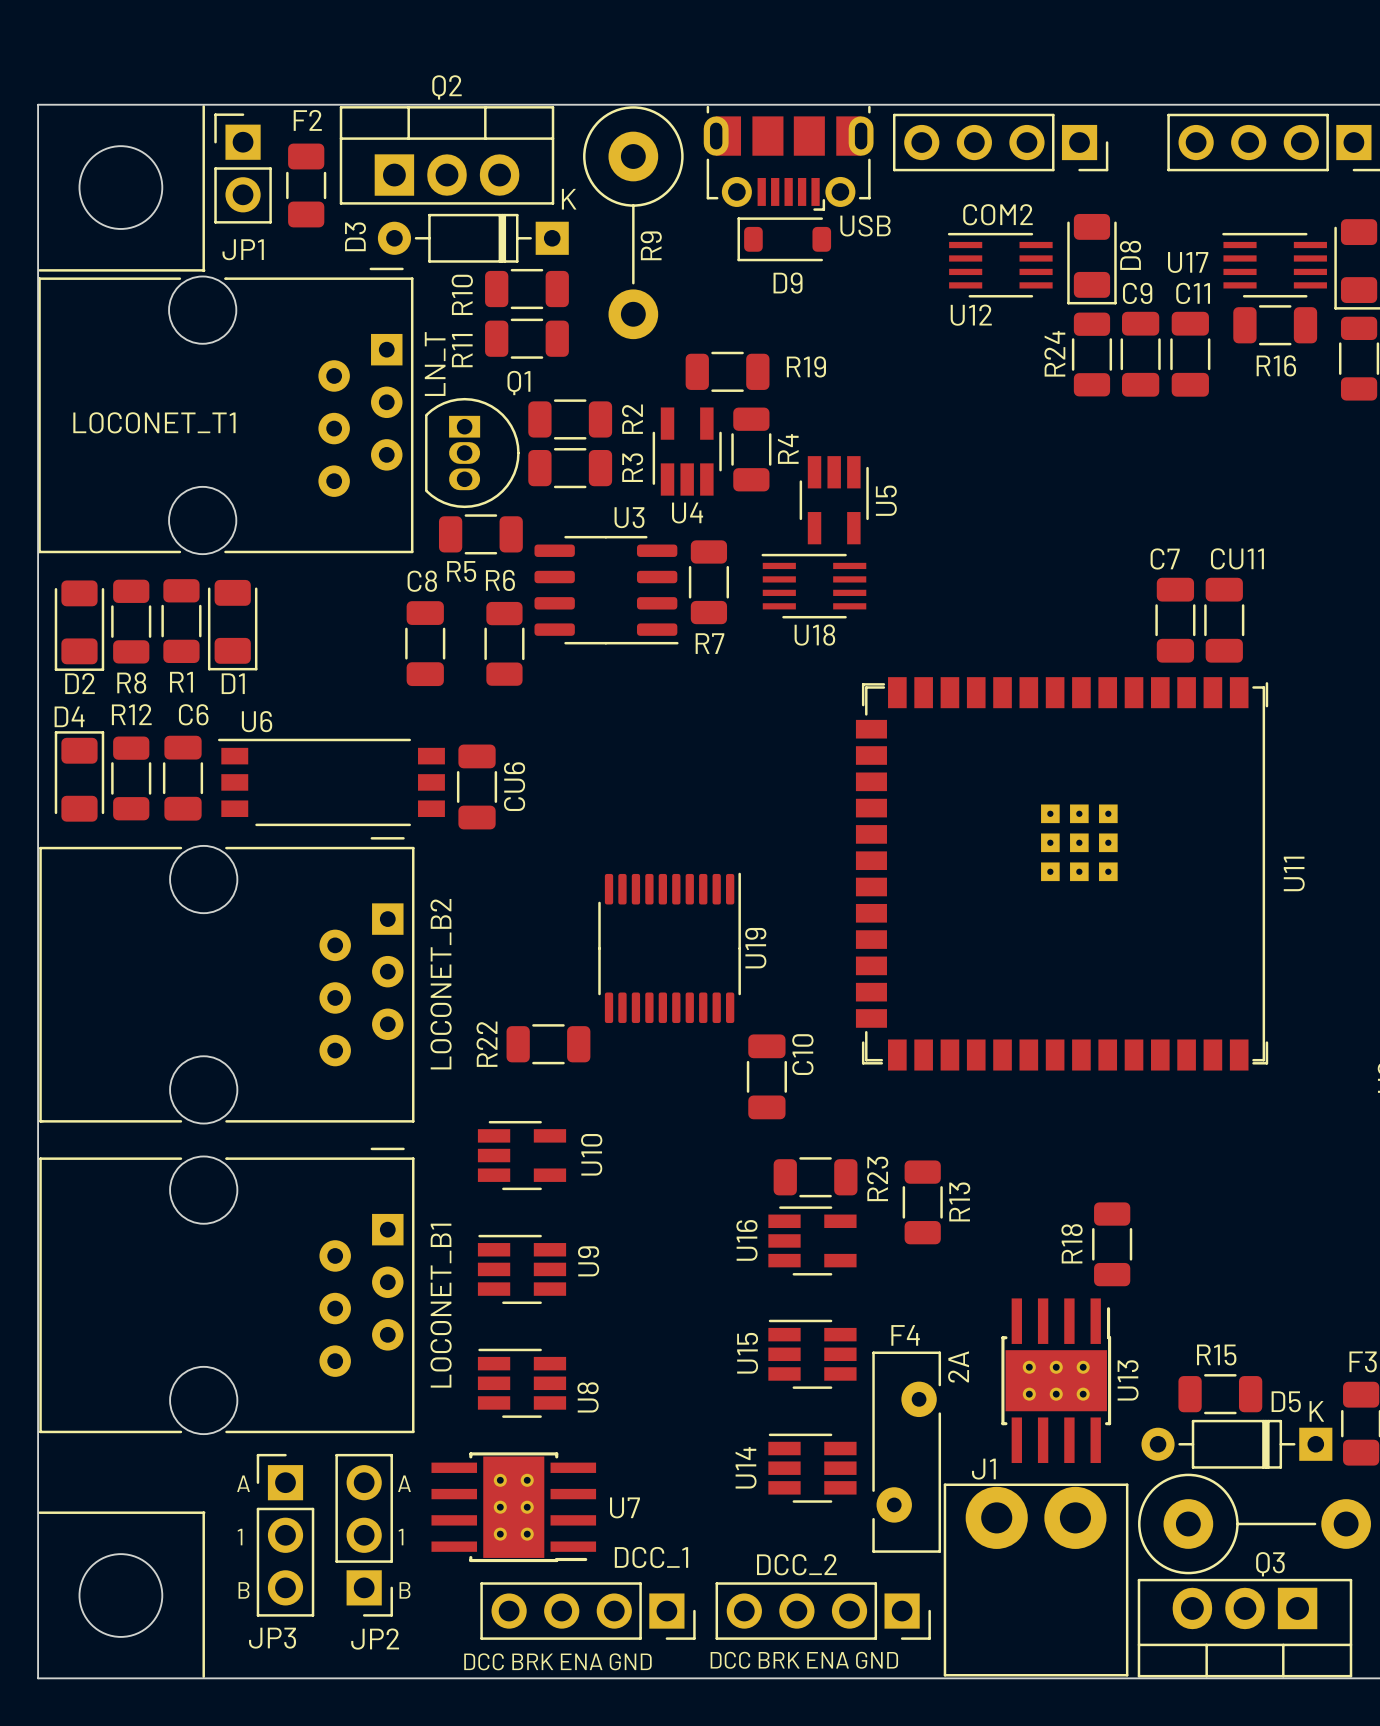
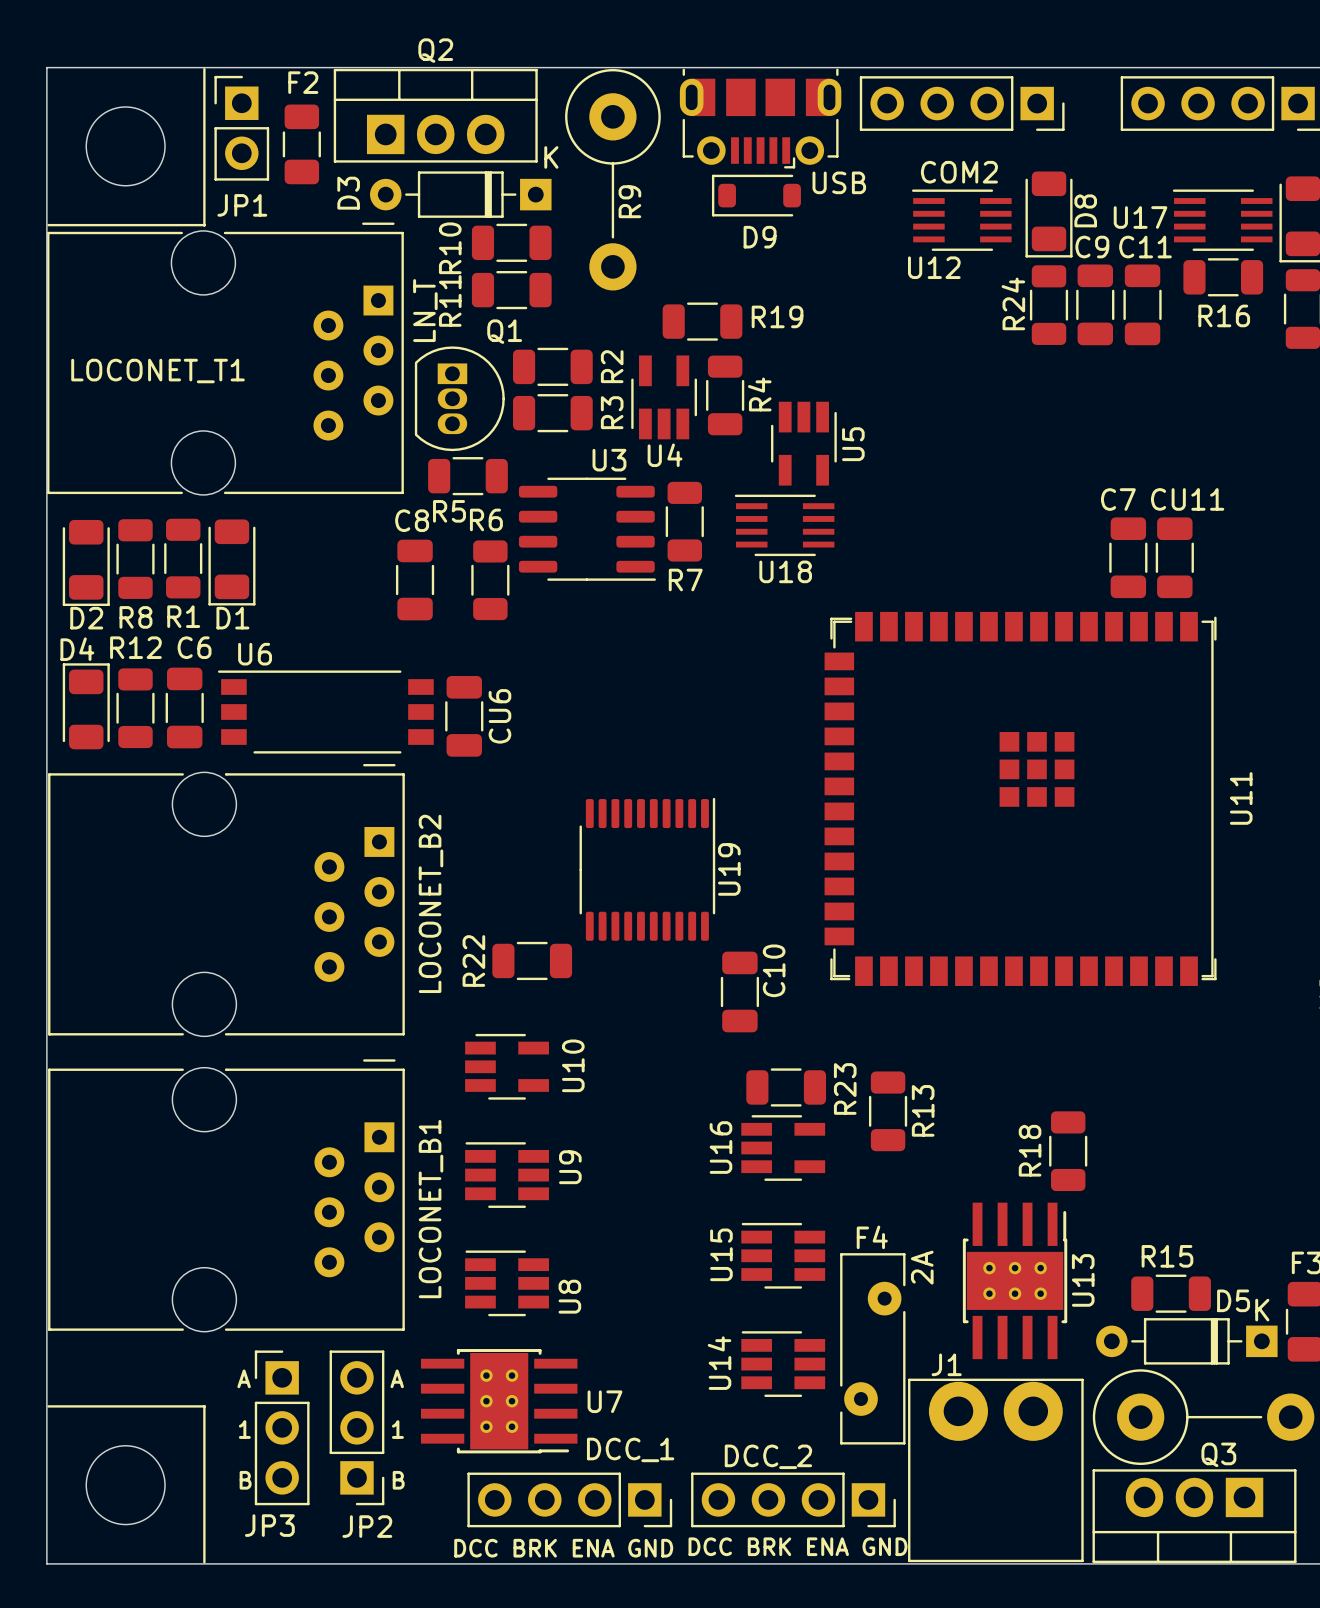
U11 footprint: [855, 677, 1269, 1071] -> [824, 611, 1217, 986]

